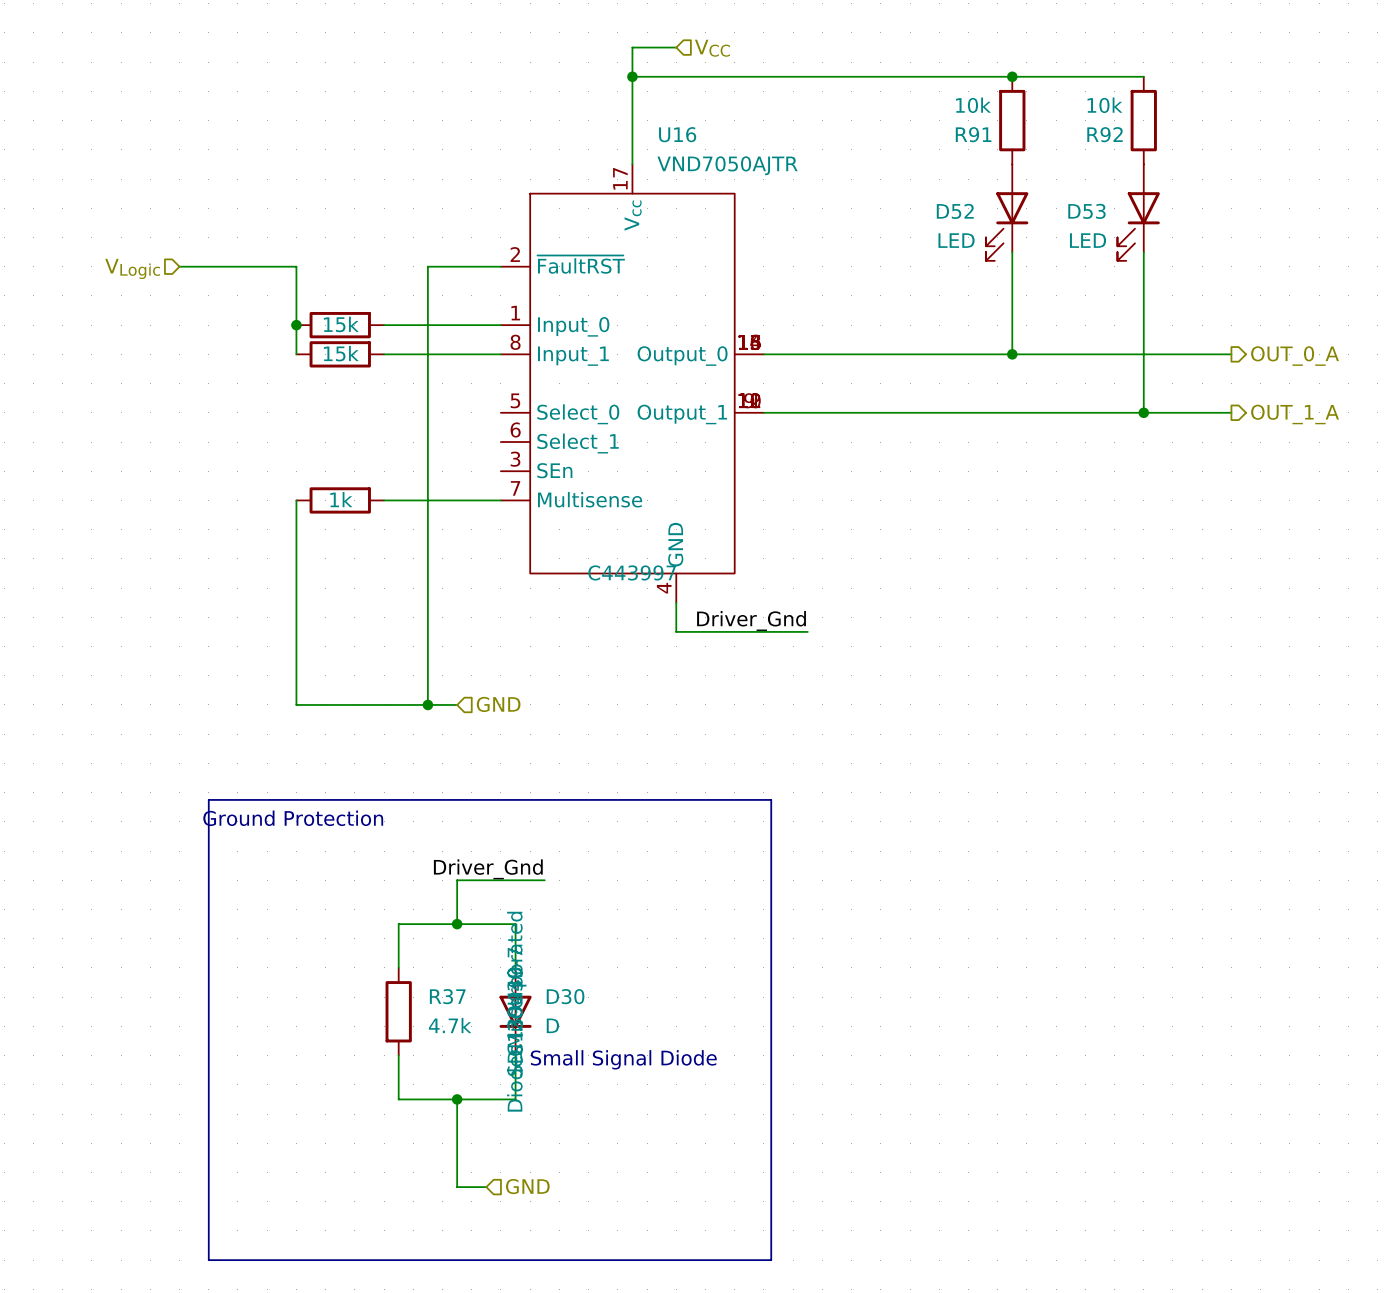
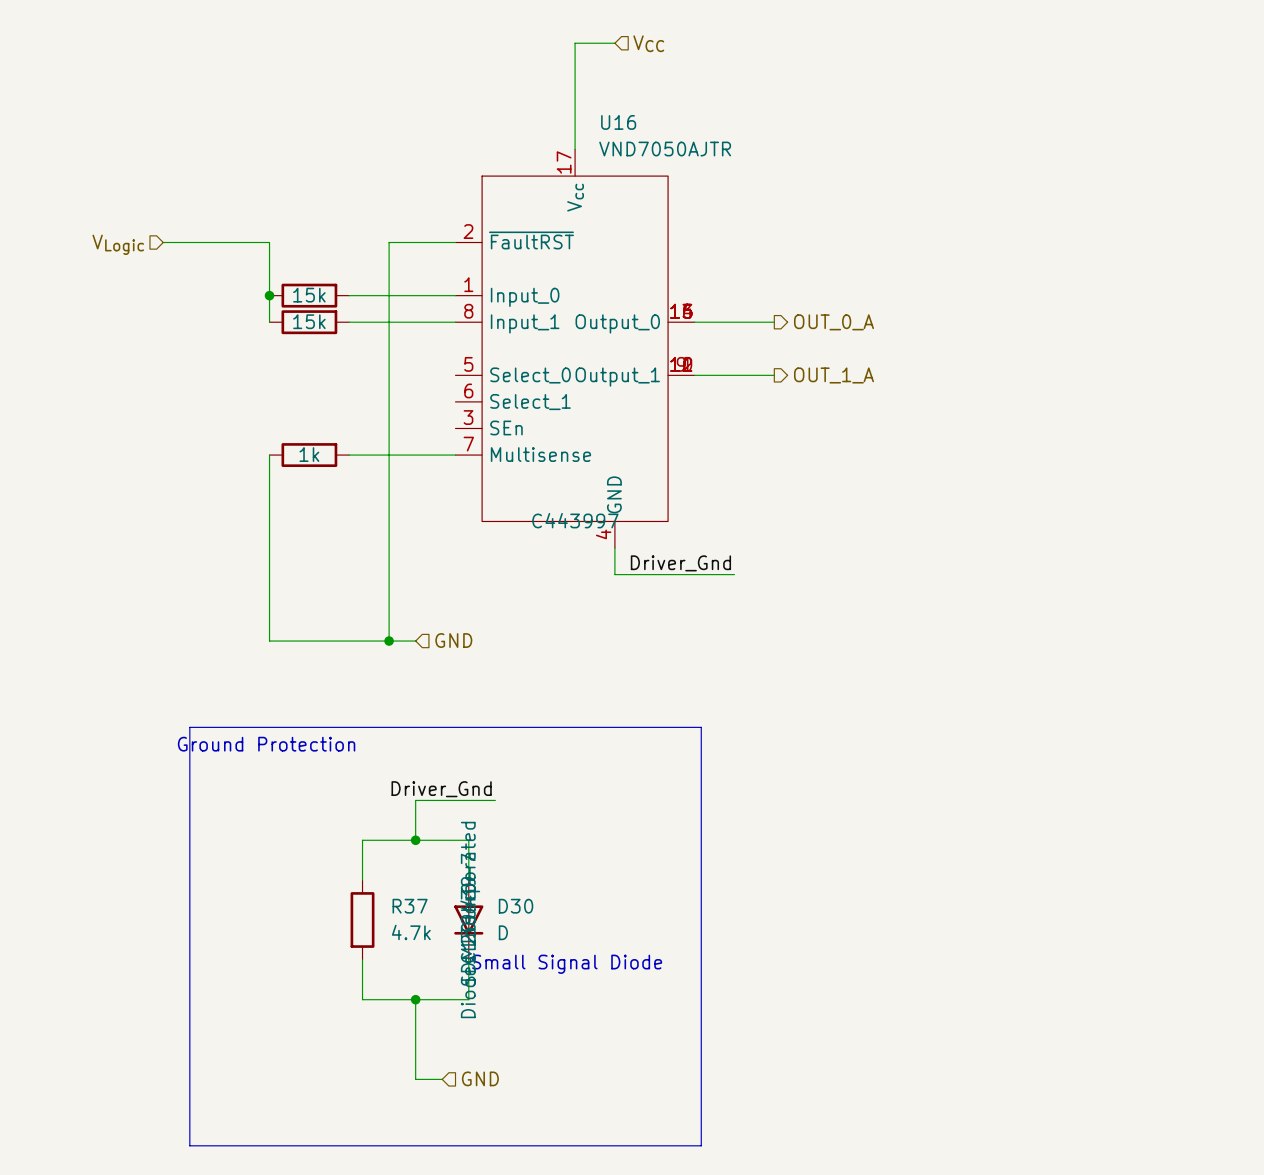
wire: (632, 76) (1143, 76) -> none
junction: (632, 76) -> none
junction: (1012, 76) -> none
R91: 10k (1012, 120) -> none
R92: 10k (1143, 120) -> none
D52: LED (1007, 212) -> none
D53: LED (1138, 212) -> none
wire: (1012, 252) (1012, 354) -> none
wire: (1143, 252) (1143, 412) -> none
wire: (851, 354) (1231, 354) -> none
junction: (1012, 354) -> none
hierarchical label: none -> OUT_0_A (834, 322)
hierarchical label: OUT_0_A (1295, 356) -> none
wire: (851, 412) (1231, 412) -> none
junction: (1143, 412) -> none
hierarchical label: none -> OUT_1_A (834, 375)
hierarchical label: OUT_1_A (1295, 414) -> none

